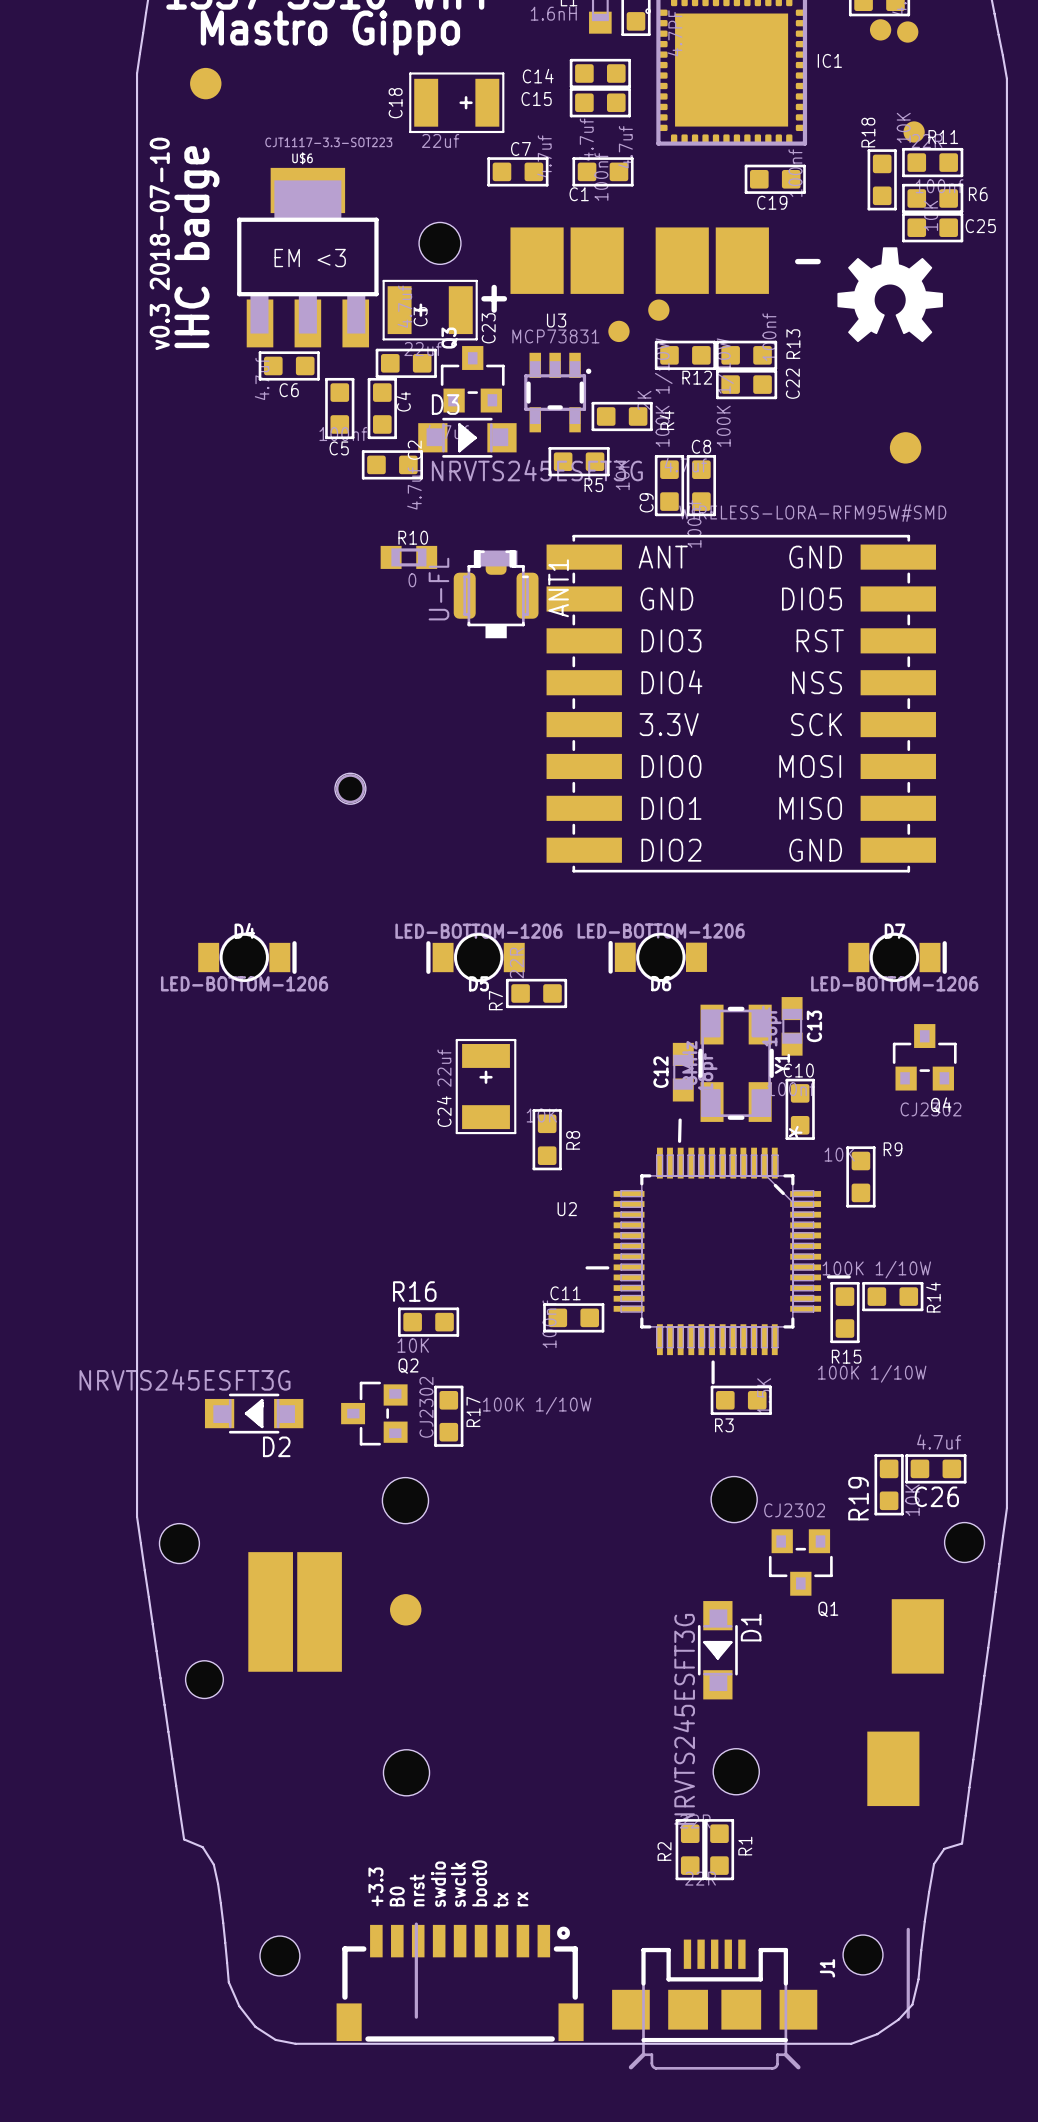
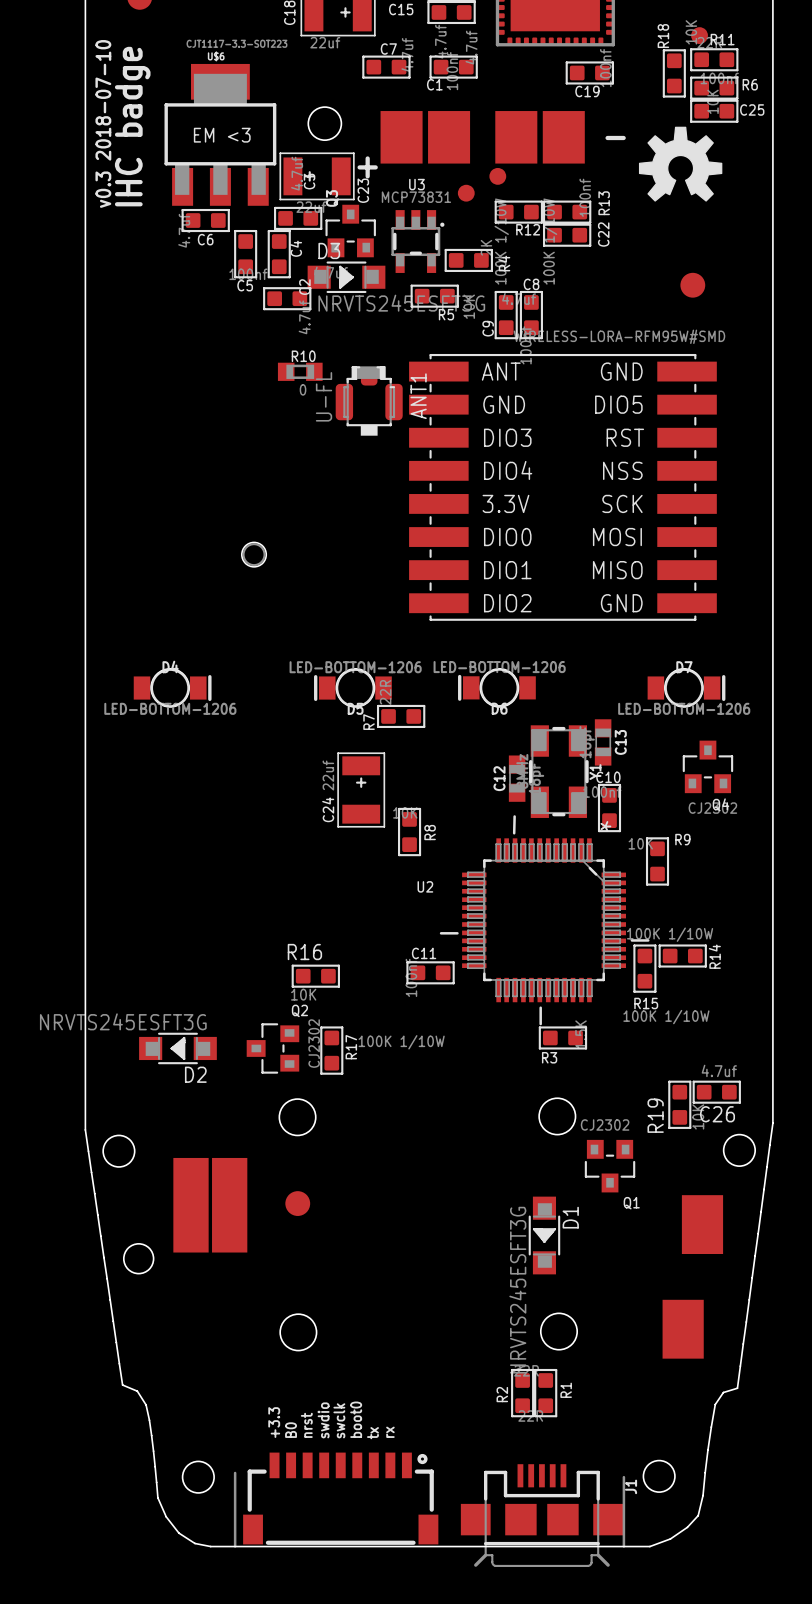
line: (416, 1924) (416, 2017) -> (235, 1472) (235, 1546)
line: (908, 1929) (908, 2017) -> (623, 1477) (623, 1546)

